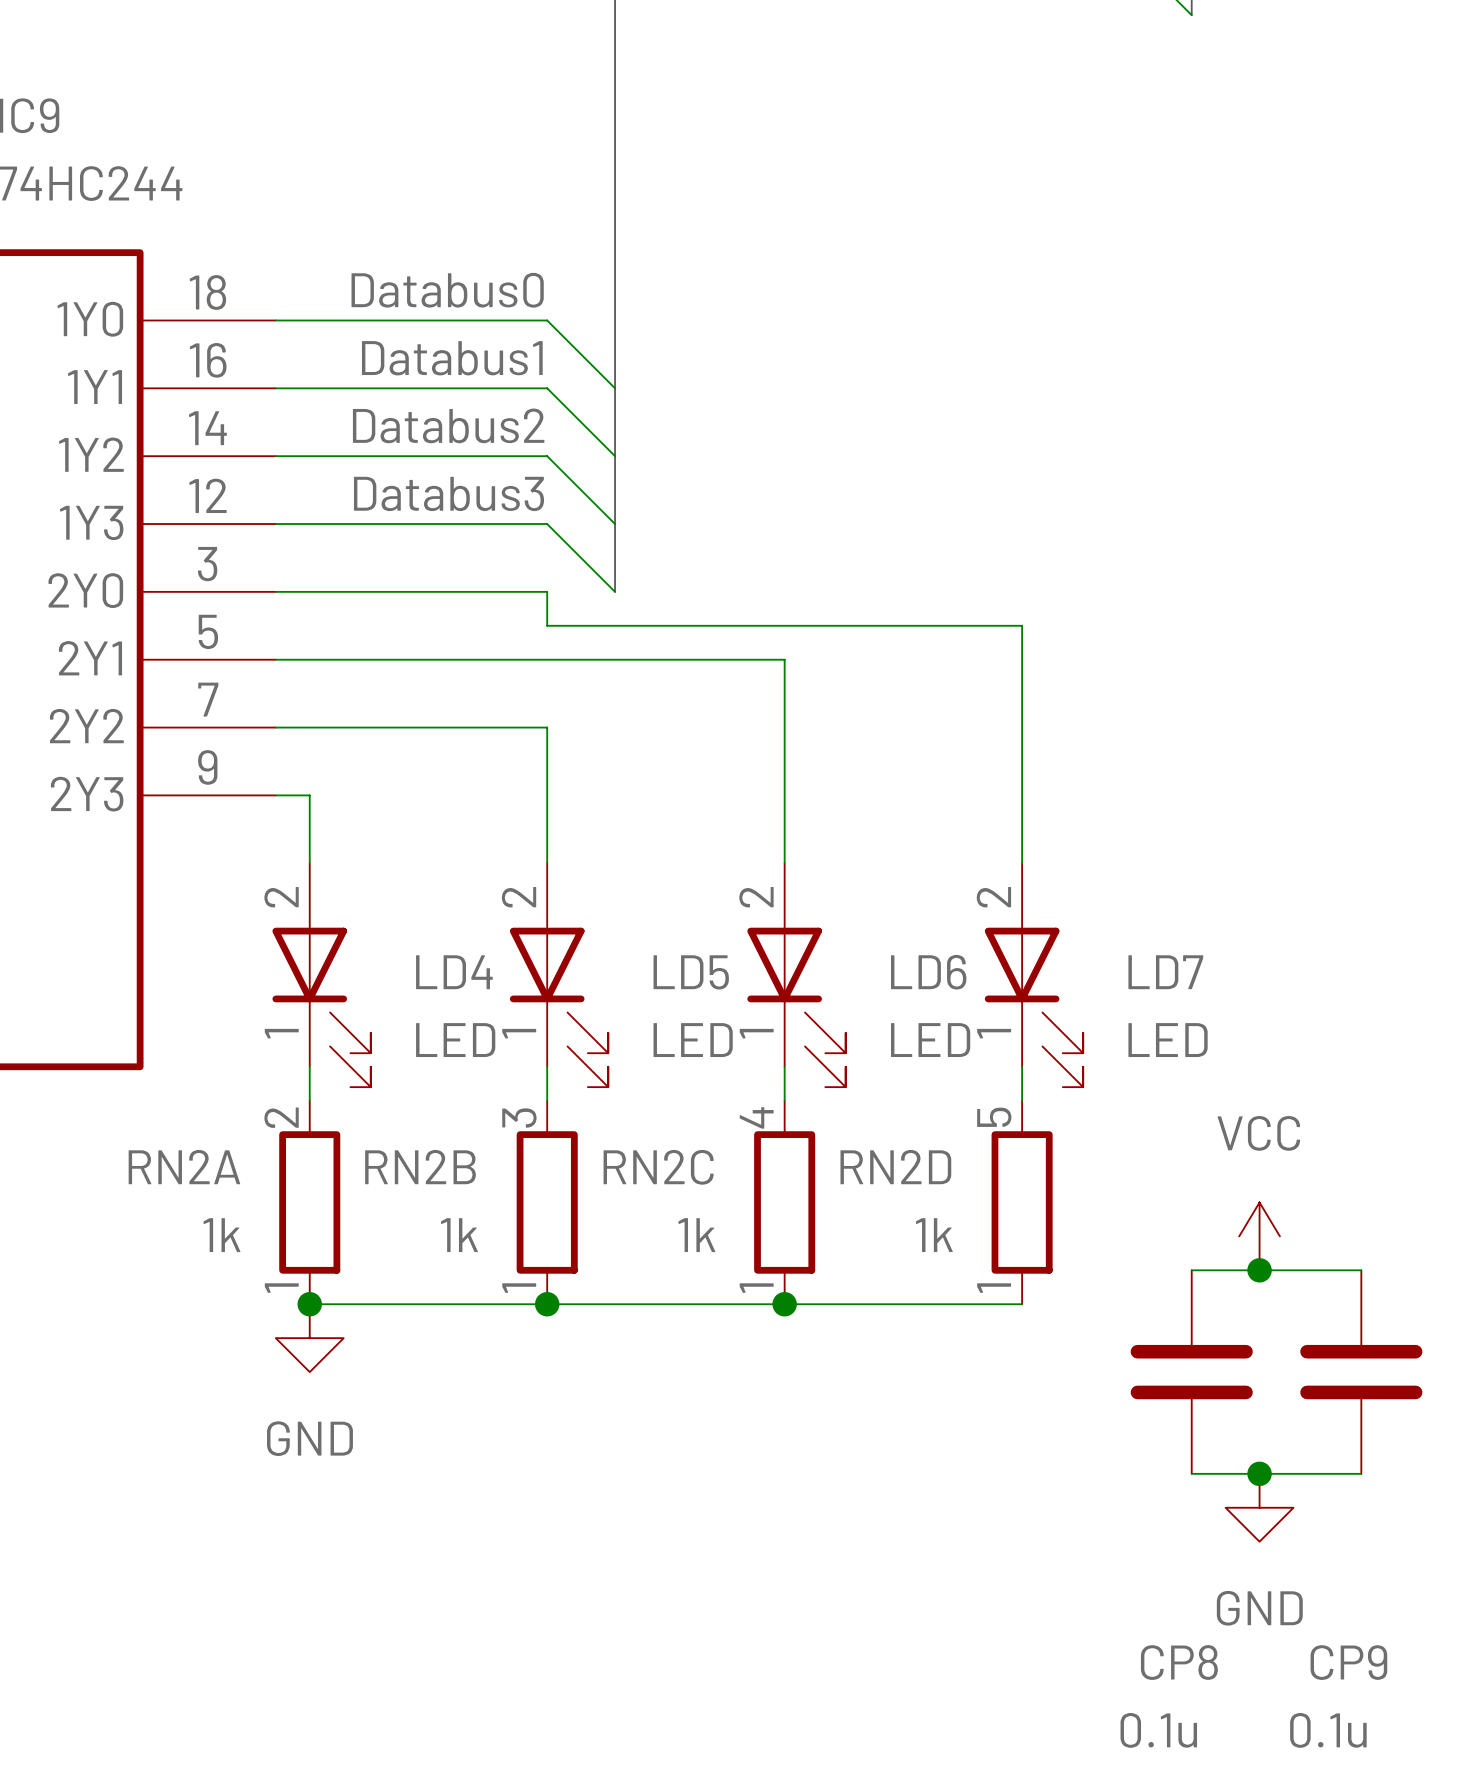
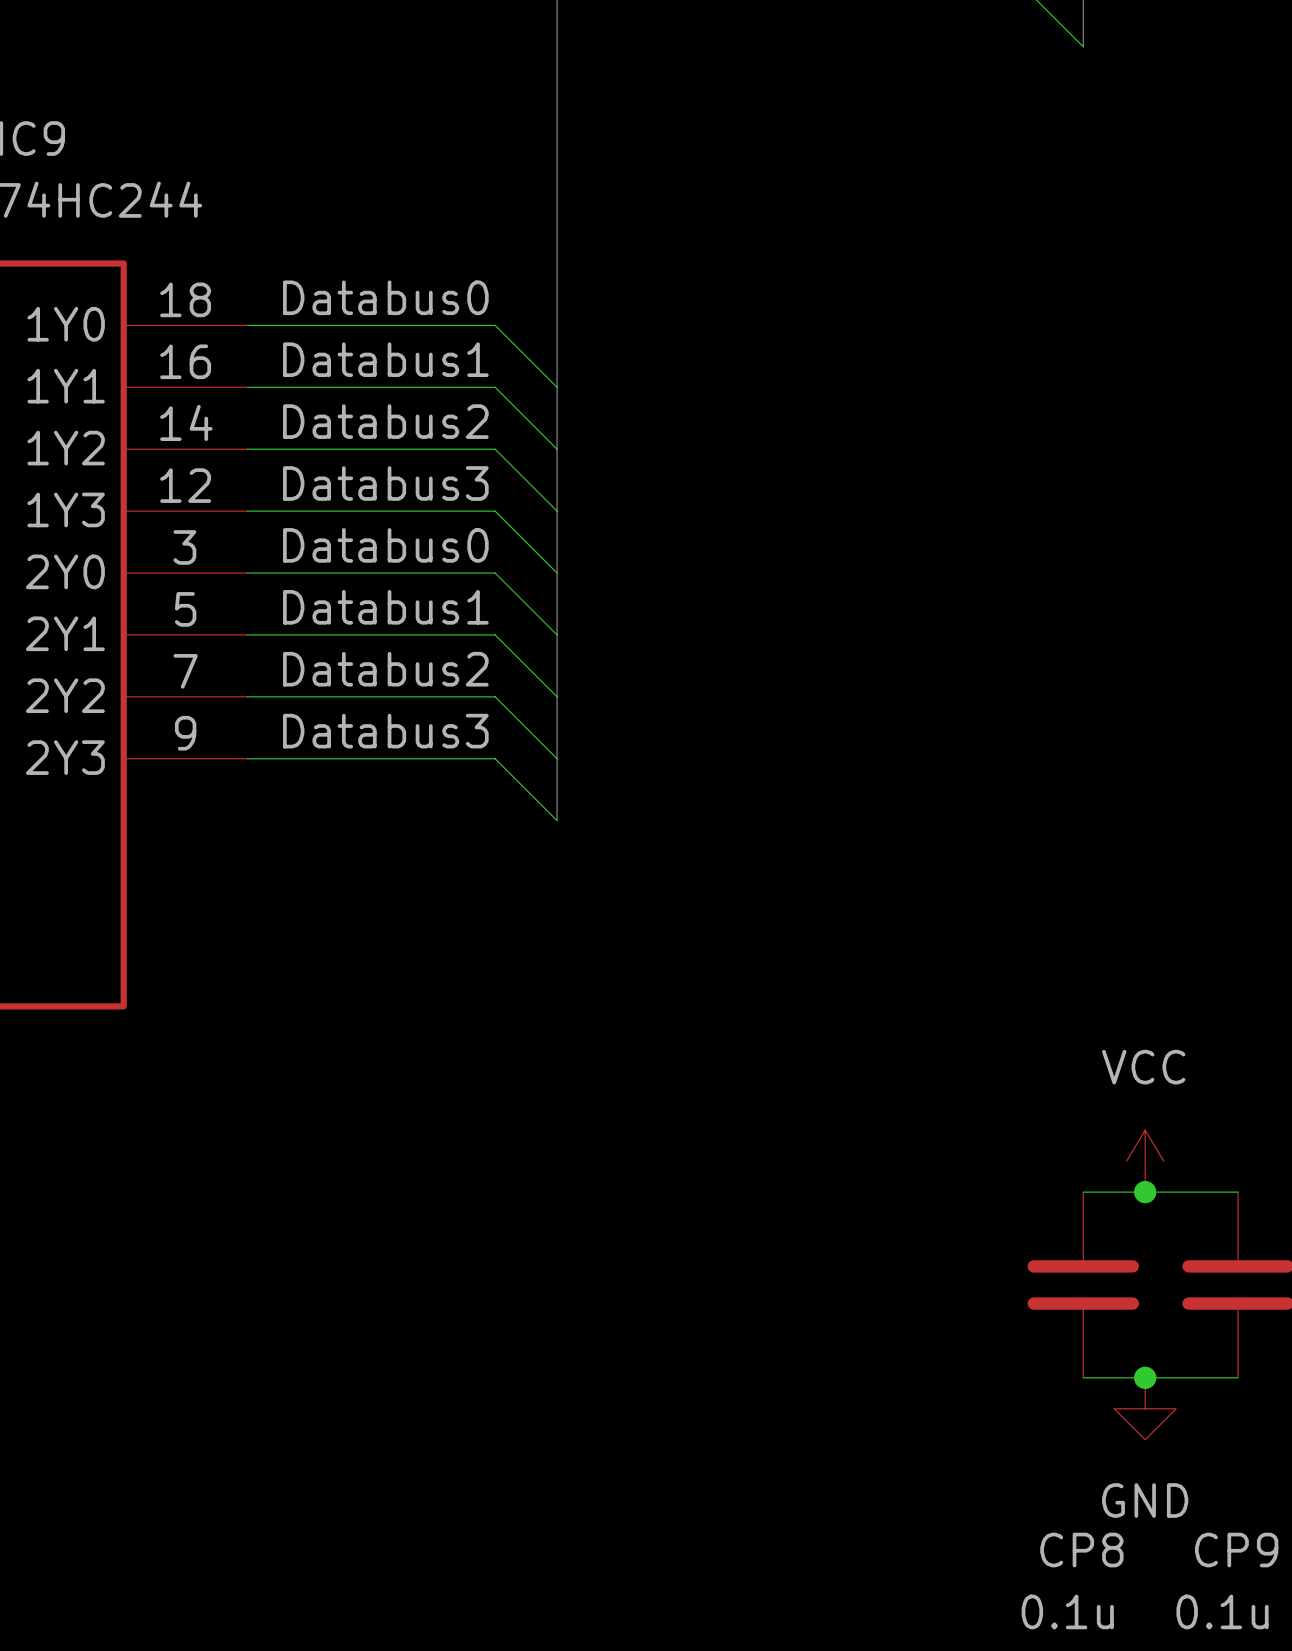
label: none -> Databus0 (385, 545)
wire: (547, 591) (547, 625) (1022, 625) (1022, 863) -> (495, 573) (557, 634)
bus: none -> (557, 573) (557, 820)
label: none -> Databus1 (385, 607)
wire: (547, 659) (784, 659) (784, 863) -> (495, 634) (557, 696)
label: none -> Databus2 (385, 669)
wire: (547, 727) (547, 863) -> (495, 696) (557, 758)
label: none -> Databus3 (385, 731)
wire: (309, 795) (309, 863) -> (278, 758) (495, 758) (557, 820)
LD4: LED (321, 975) -> none
LD5: LED (559, 975) -> none
LD6: LED (796, 975) -> none
LD7: LED (1033, 975) -> none
wire: (309, 1066) (309, 1100) -> none
wire: (547, 1066) (547, 1100) -> none
wire: (784, 1066) (784, 1100) -> none
wire: (1022, 1066) (1022, 1100) -> none
RN2A: 1k (309, 1202) -> none
RN2B: 1k (547, 1202) -> none
RN2C: 1k (784, 1202) -> none
RN2D: 1k (1022, 1202) -> none
wire: (309, 1304) (1022, 1304) -> none
junction: (309, 1304) -> none
junction: (547, 1304) -> none
junction: (784, 1304) -> none
power symbol: GND (309, 1338) -> none

